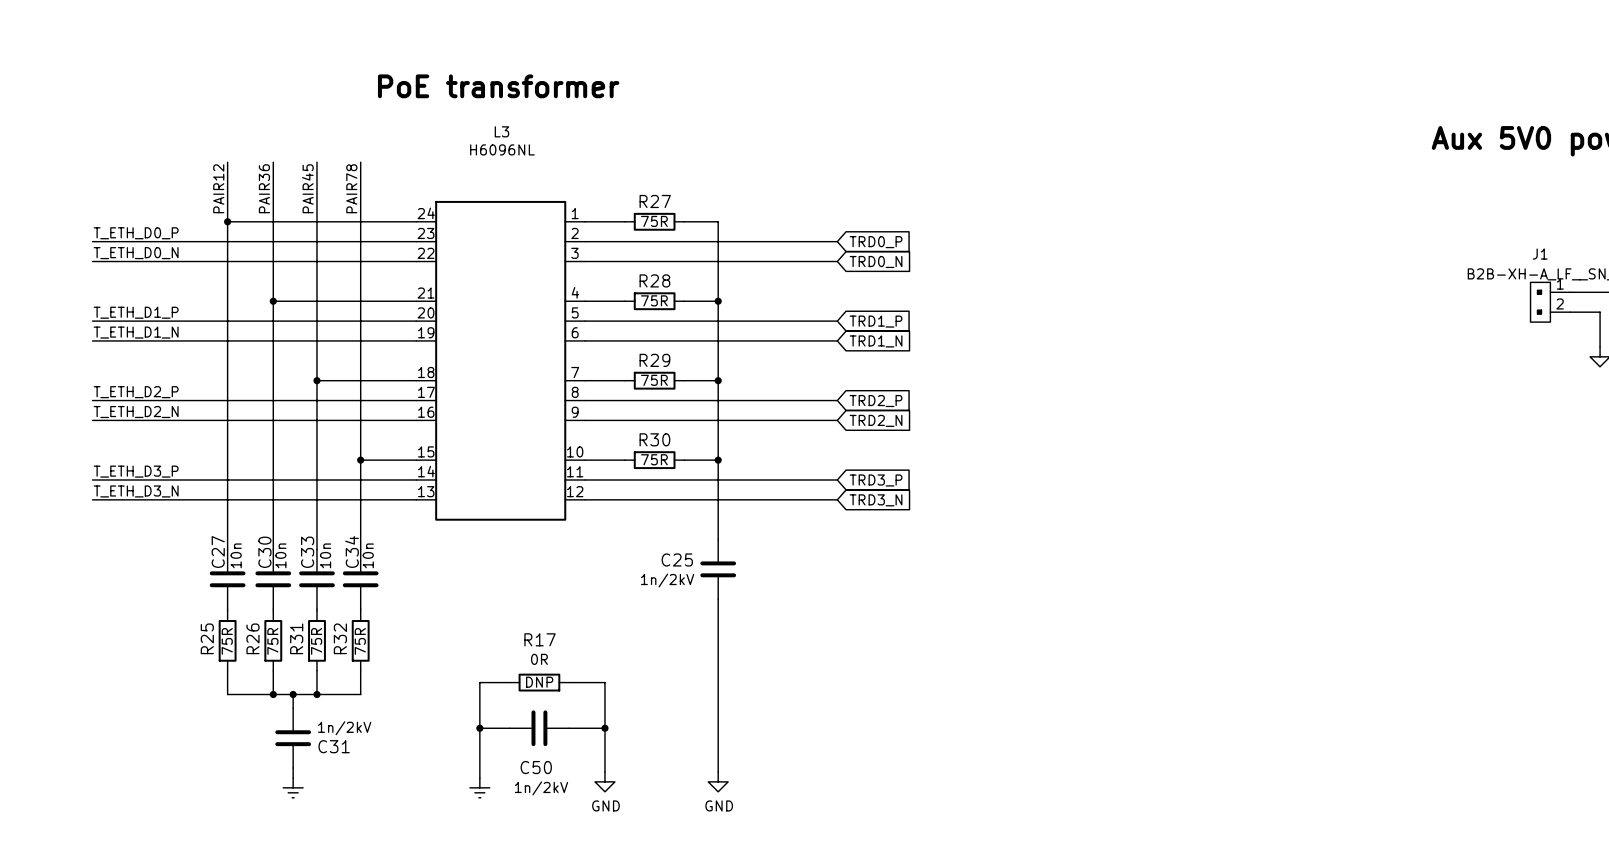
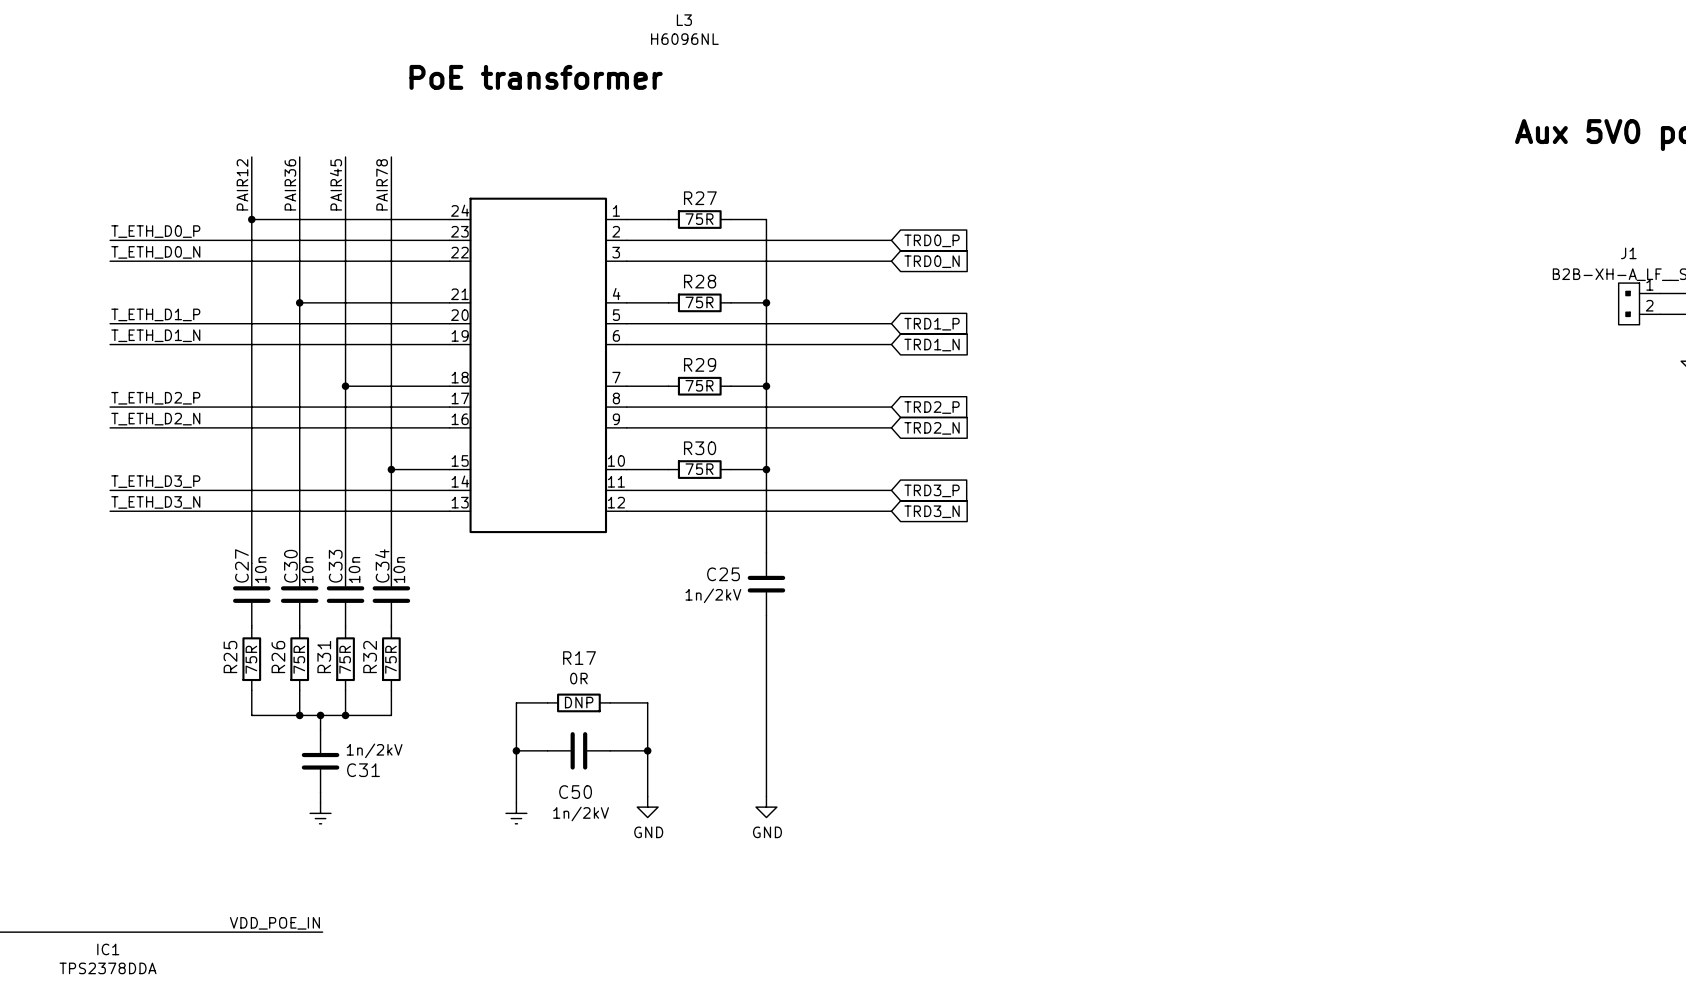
L3 name position: L3 (501, 131) -> L3 (684, 20)
L3 value position: H6096NL (502, 149) -> H6096NL (684, 39)

